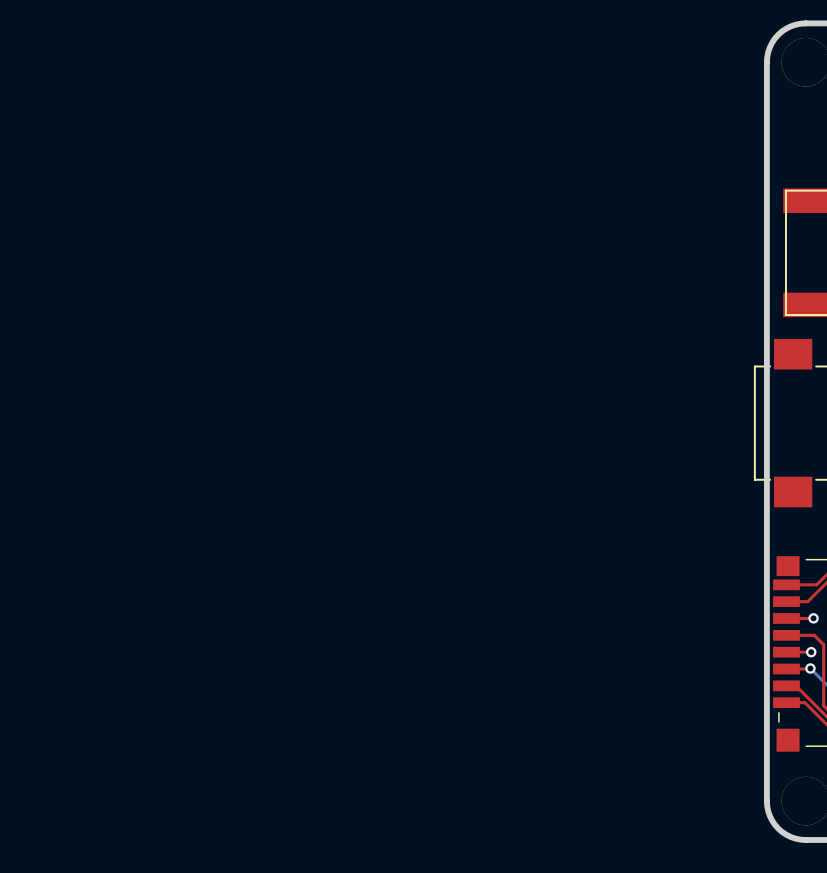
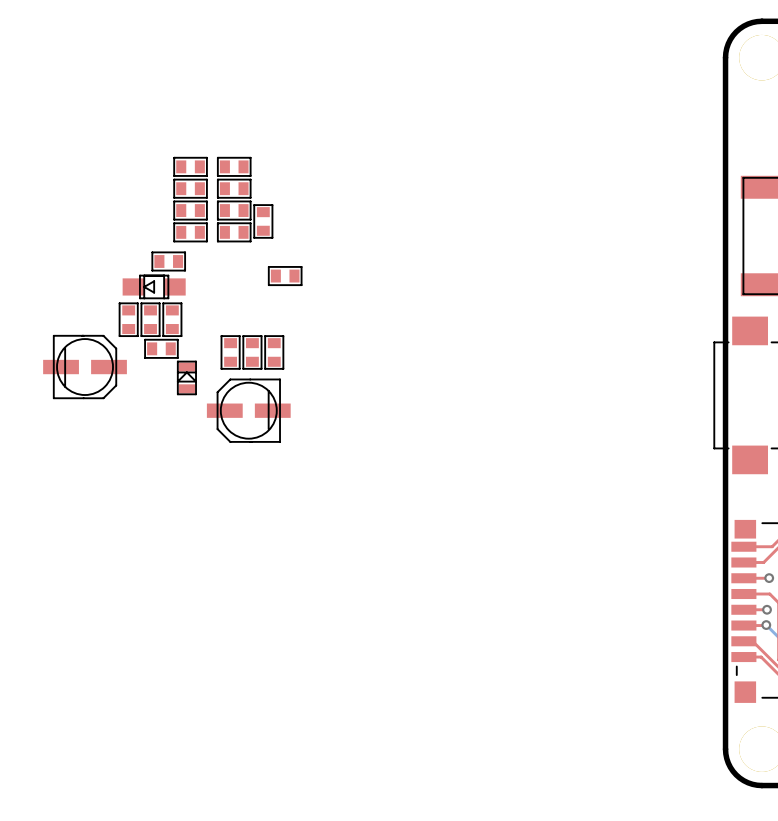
part: none -> (190, 166)
part: none -> (234, 166)
part: none -> (190, 188)
part: none -> (234, 188)
part: none -> (190, 210)
part: none -> (234, 210)
part: none -> (263, 221)
part: none -> (190, 232)
part: none -> (234, 232)
part: none -> (168, 261)
part: none -> (285, 276)
part: none -> (154, 286)
part: none -> (128, 319)
part: none -> (150, 319)
part: none -> (172, 319)
part: none -> (161, 348)
part: none -> (230, 352)
part: none -> (252, 352)
part: none -> (274, 352)
part: none -> (85, 367)
part: none -> (186, 377)
part: none -> (248, 410)

